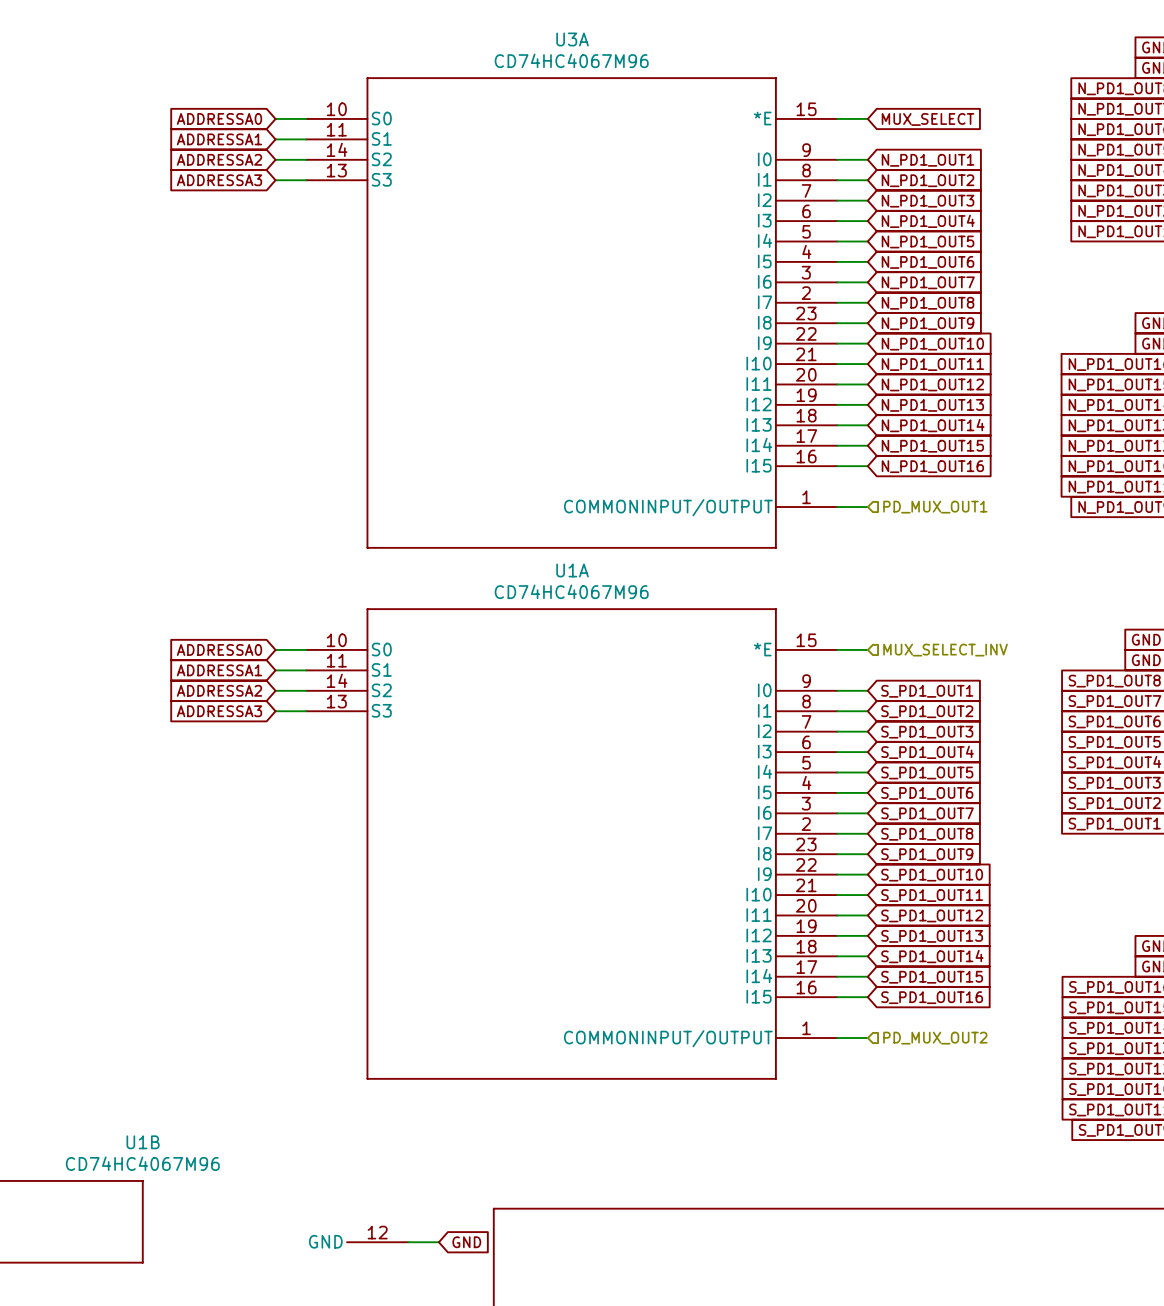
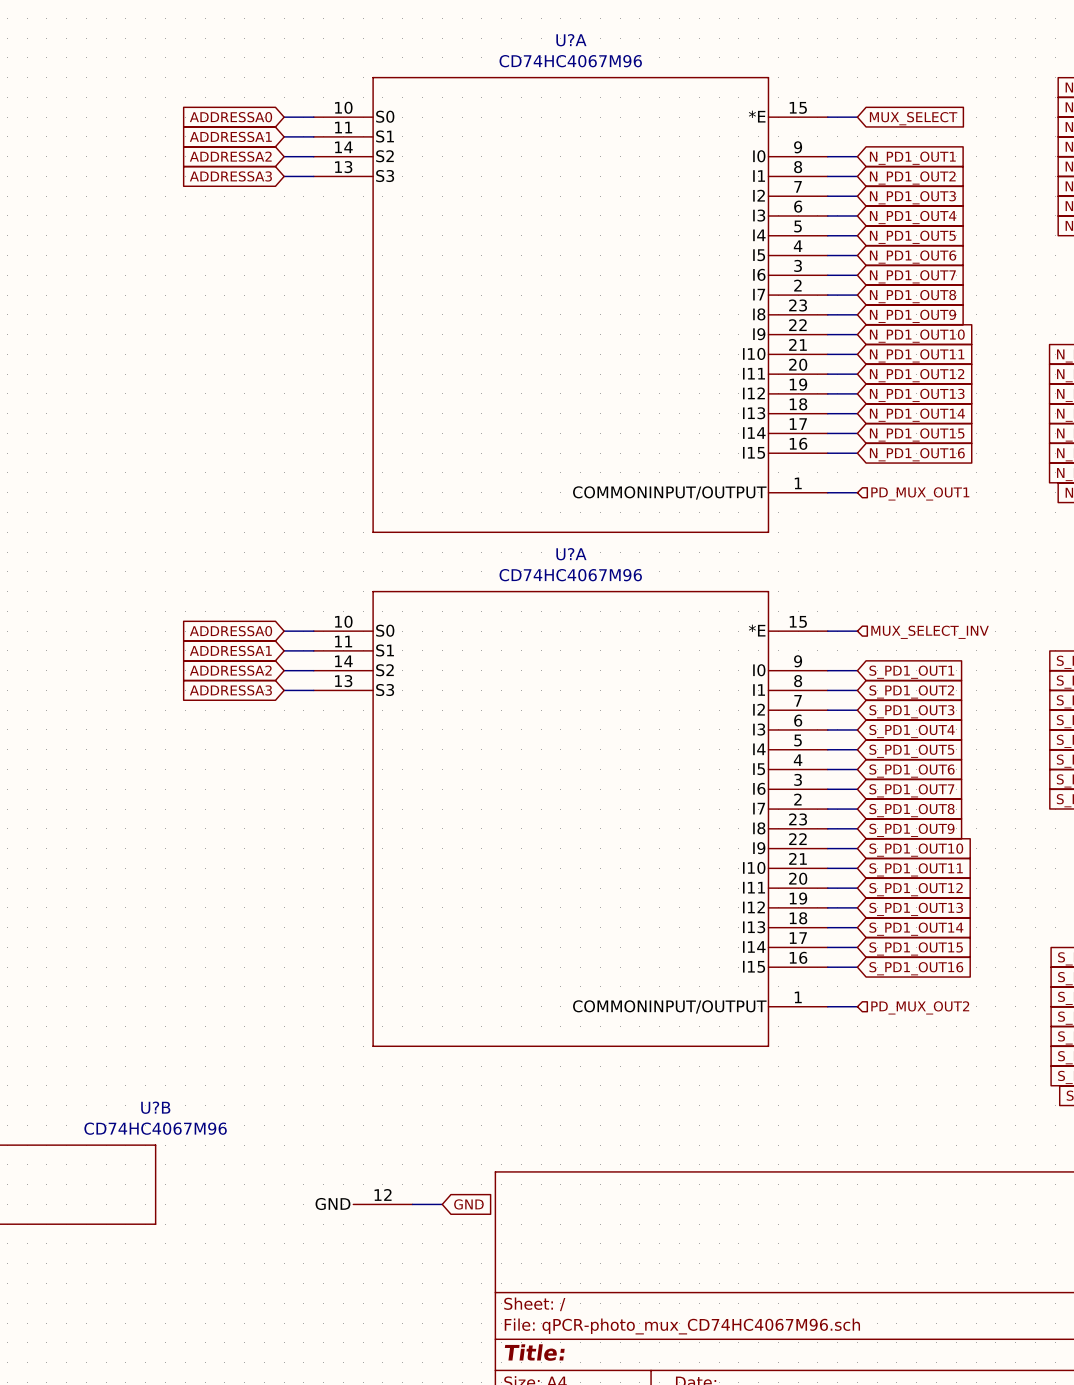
U3A name: U3A (572, 39) -> U?A (571, 40)
U1A name: U1A (572, 570) -> U?A (571, 554)
U1B name: U1B (143, 1142) -> U?B (155, 1107)

